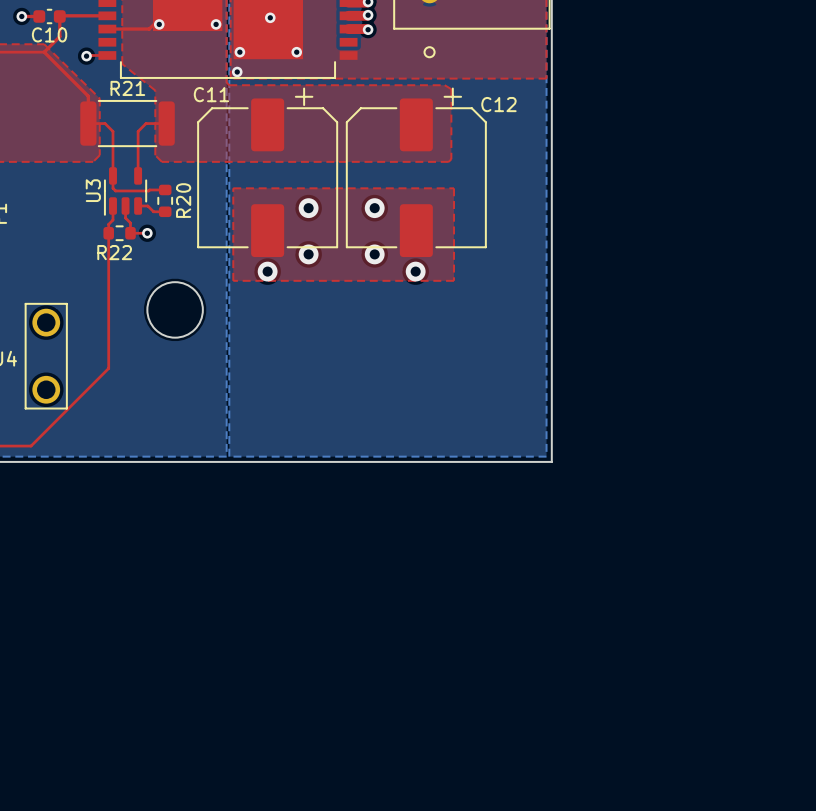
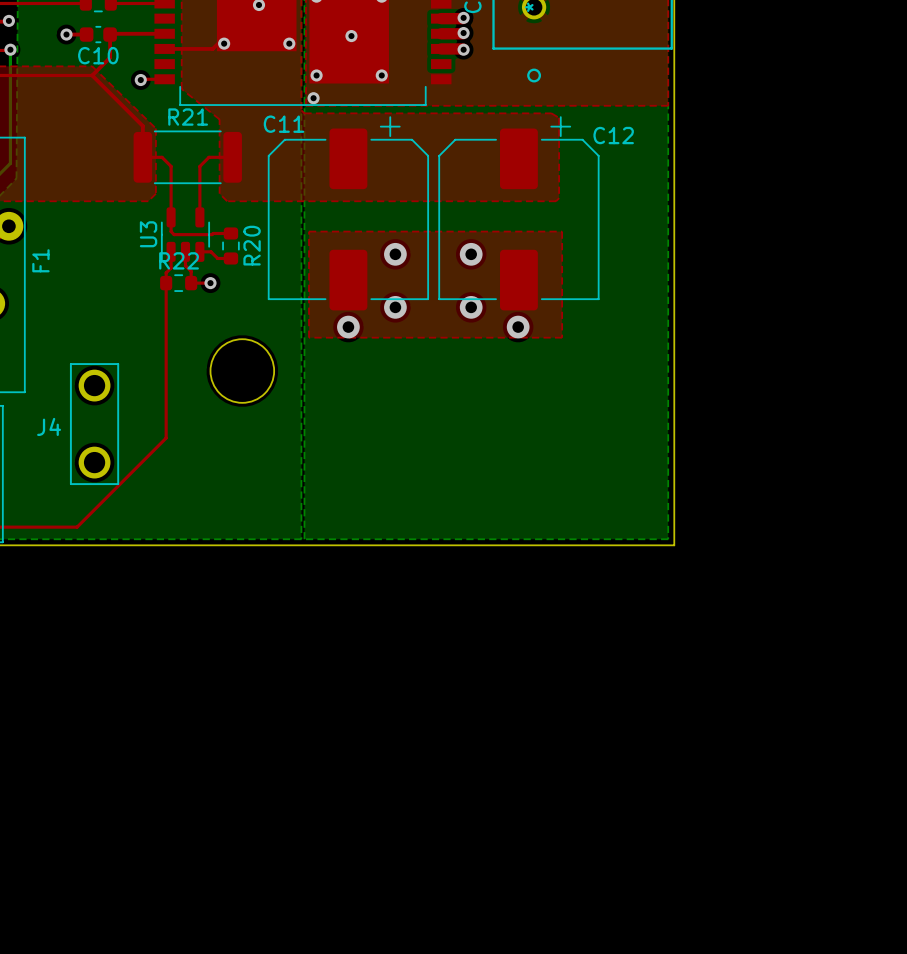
R22 name position: R22 (114, 252) -> R22 (179, 260)

